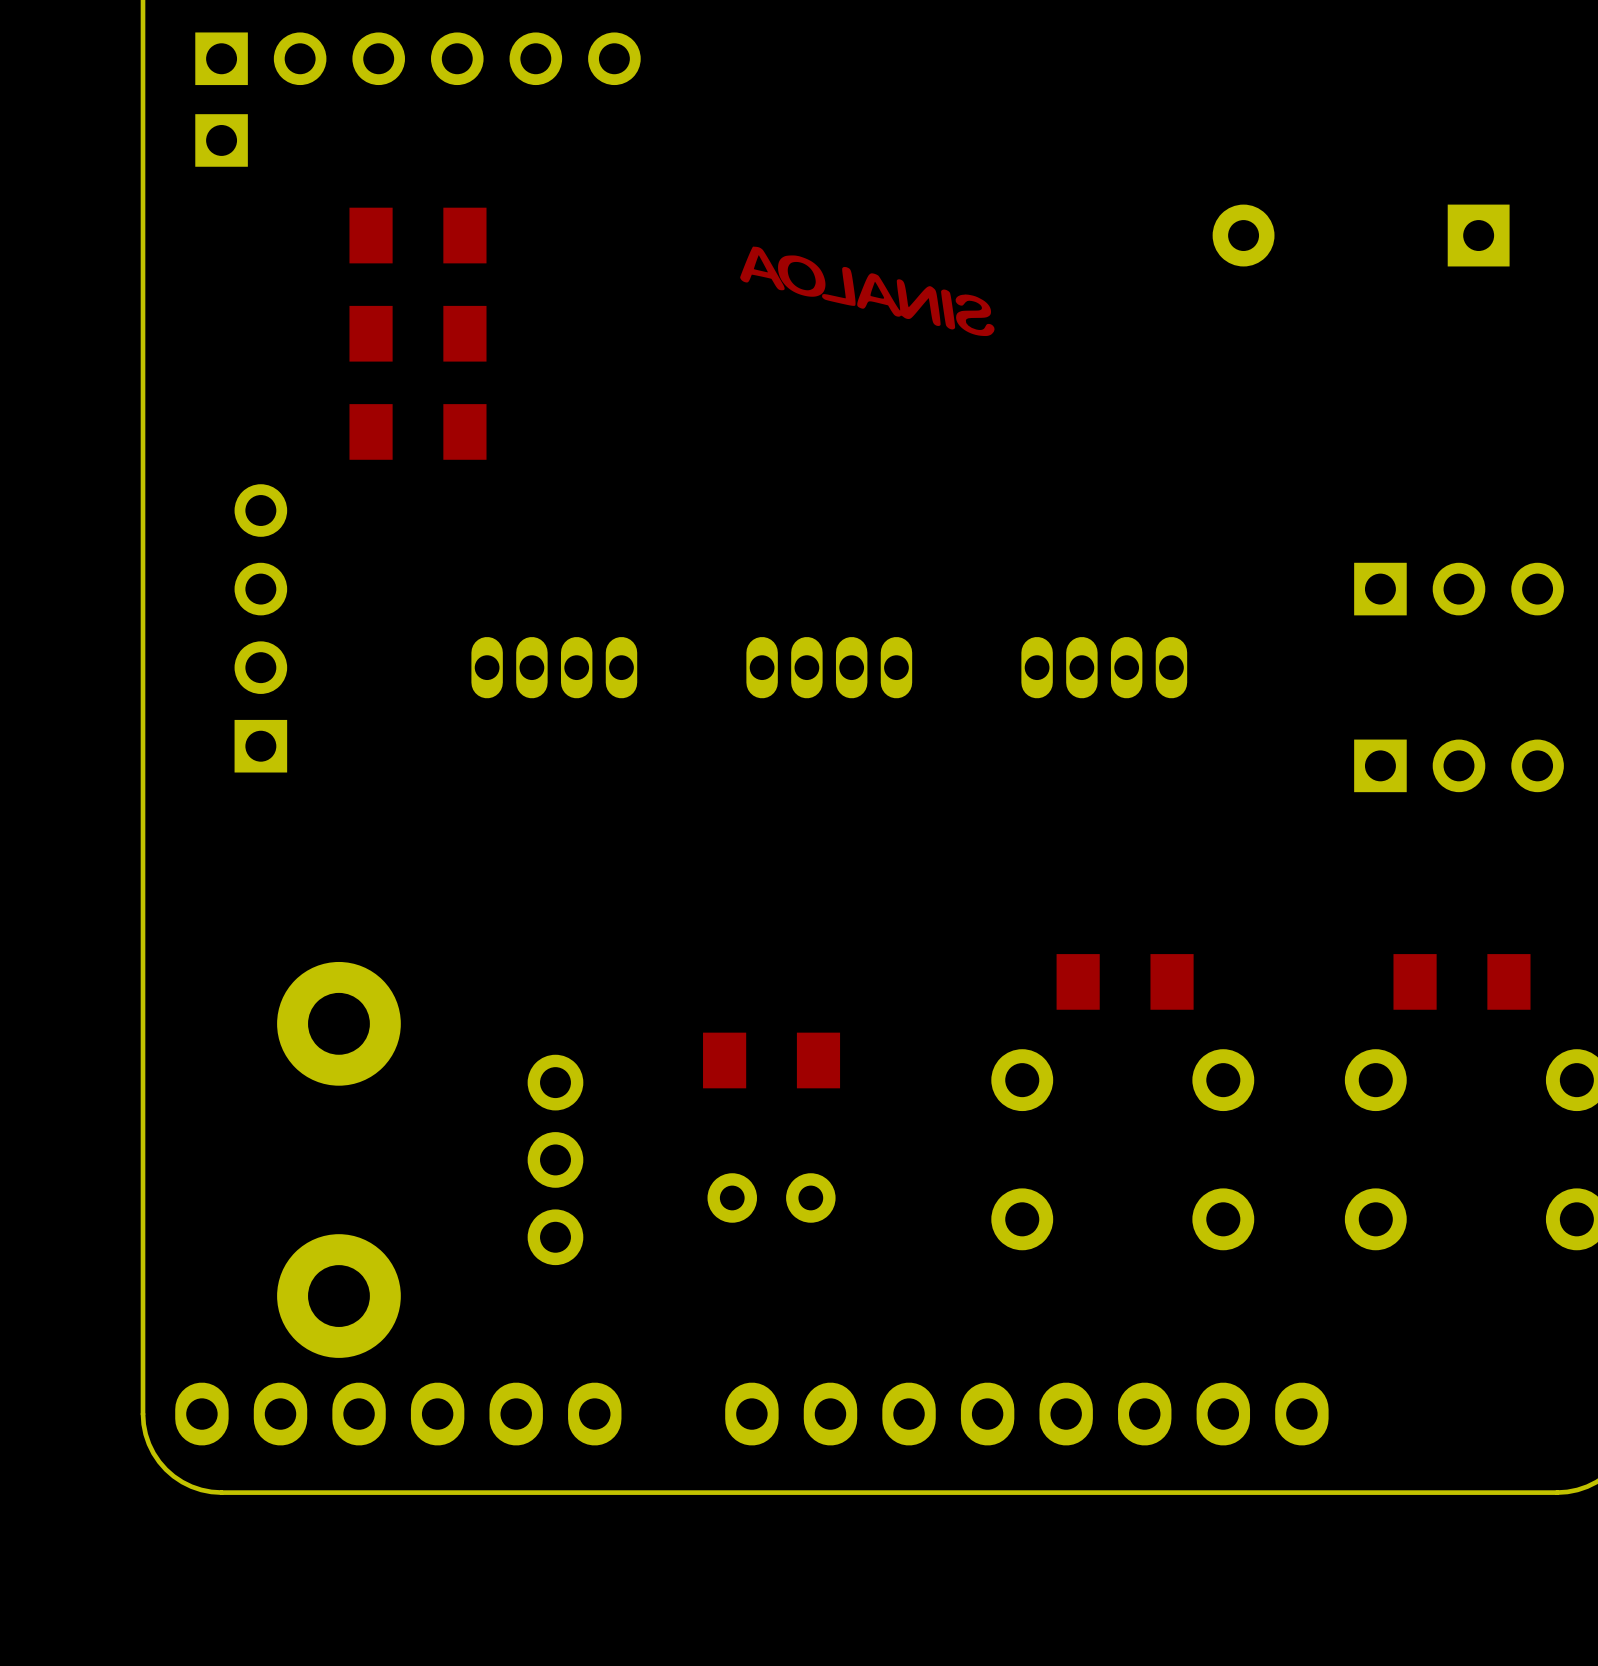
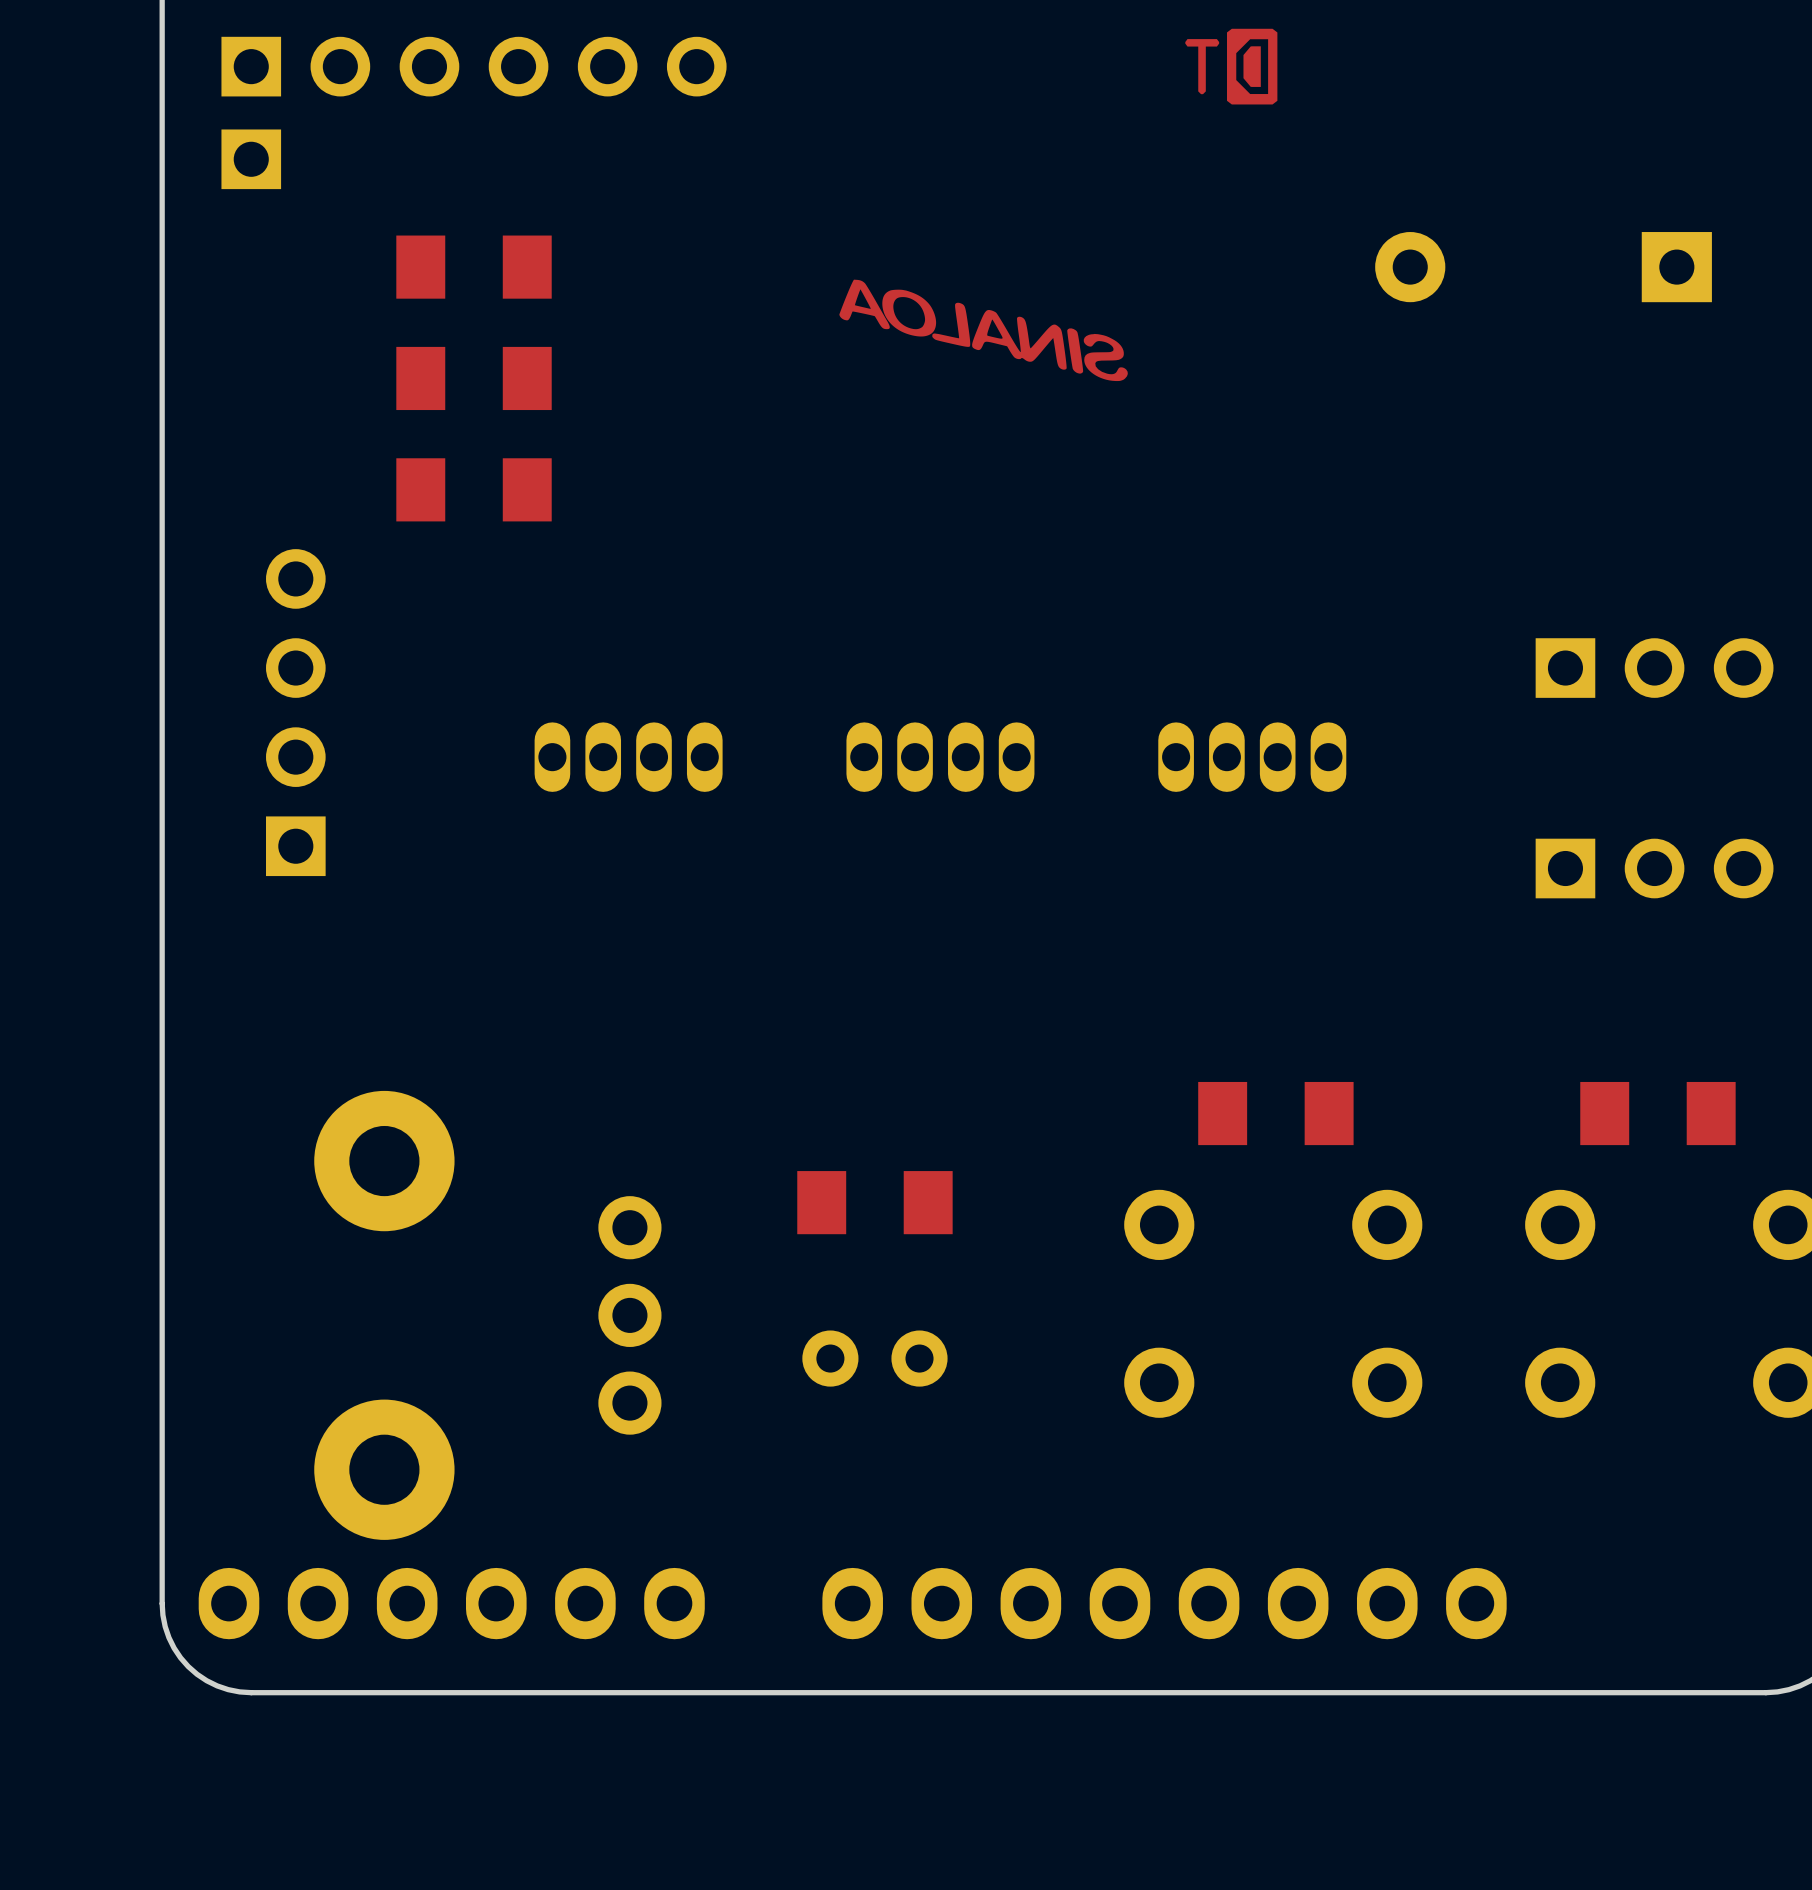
drawing: none -> [1185, 28, 1278, 105]

